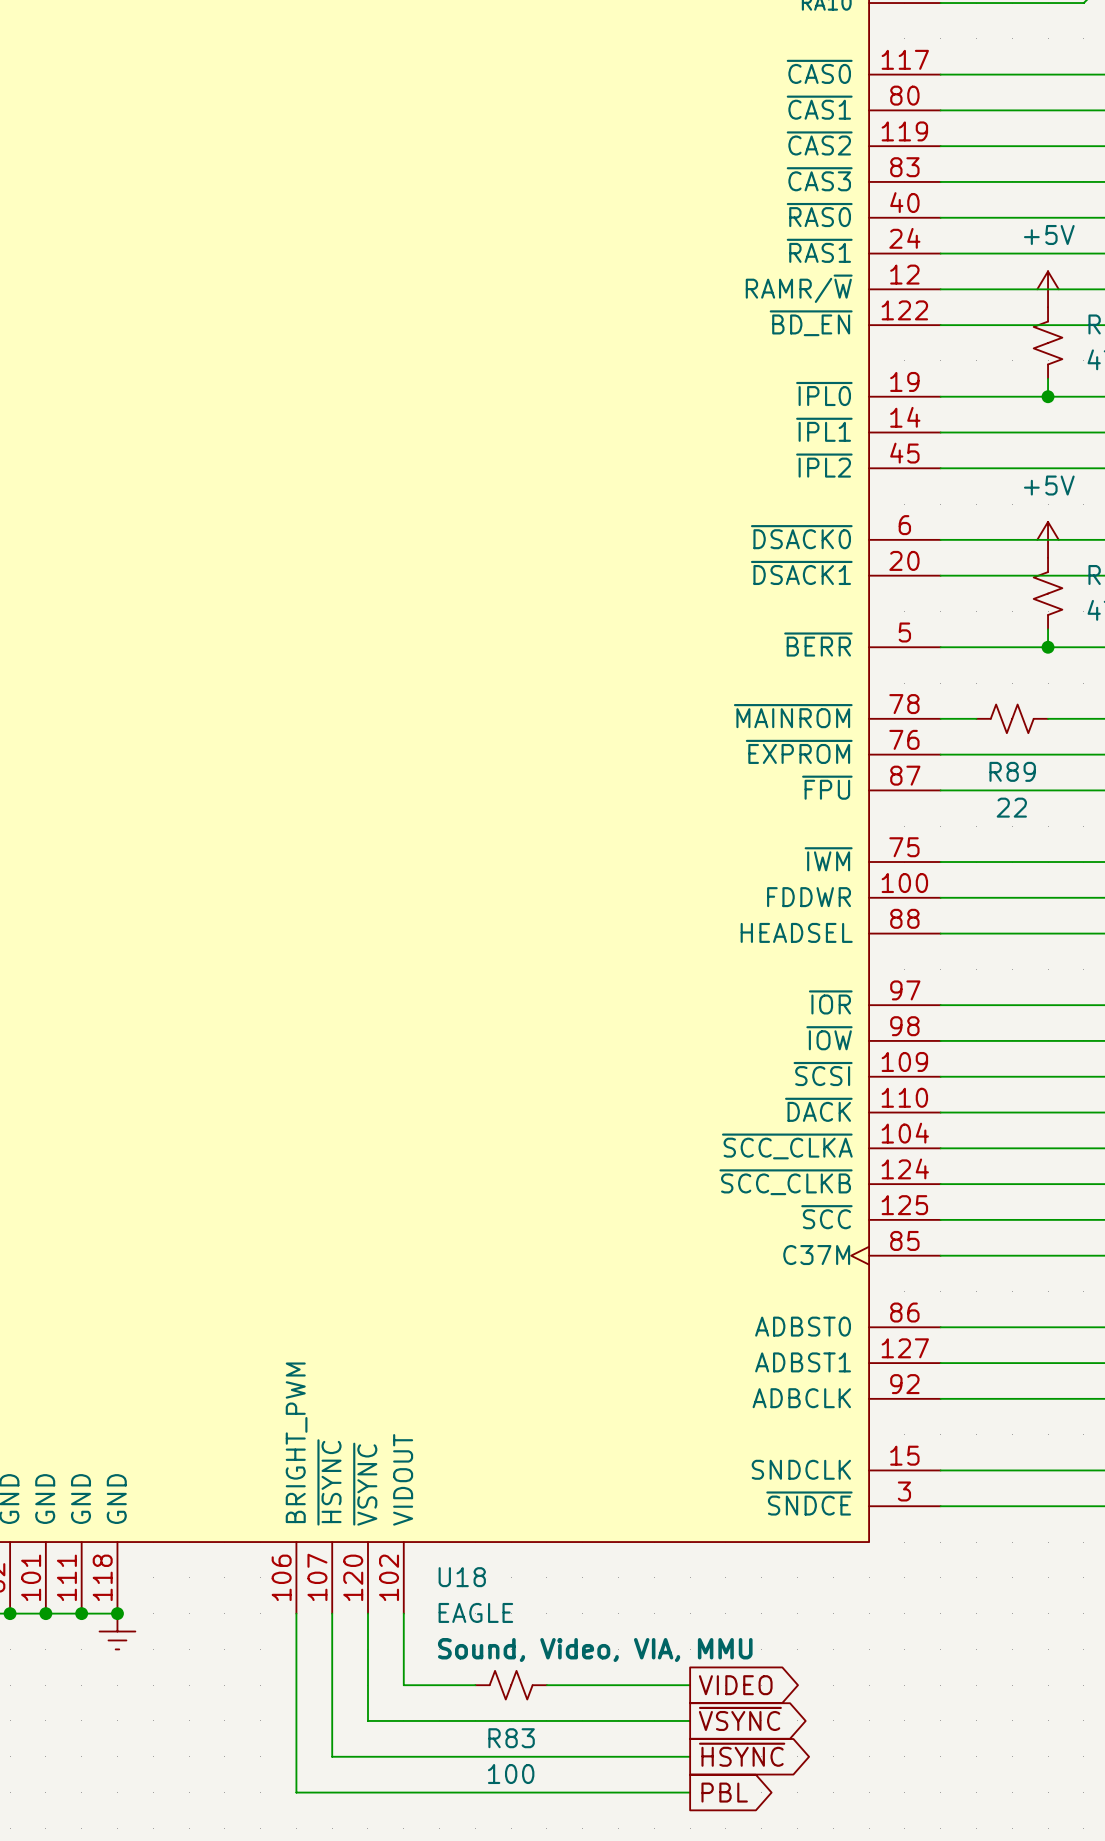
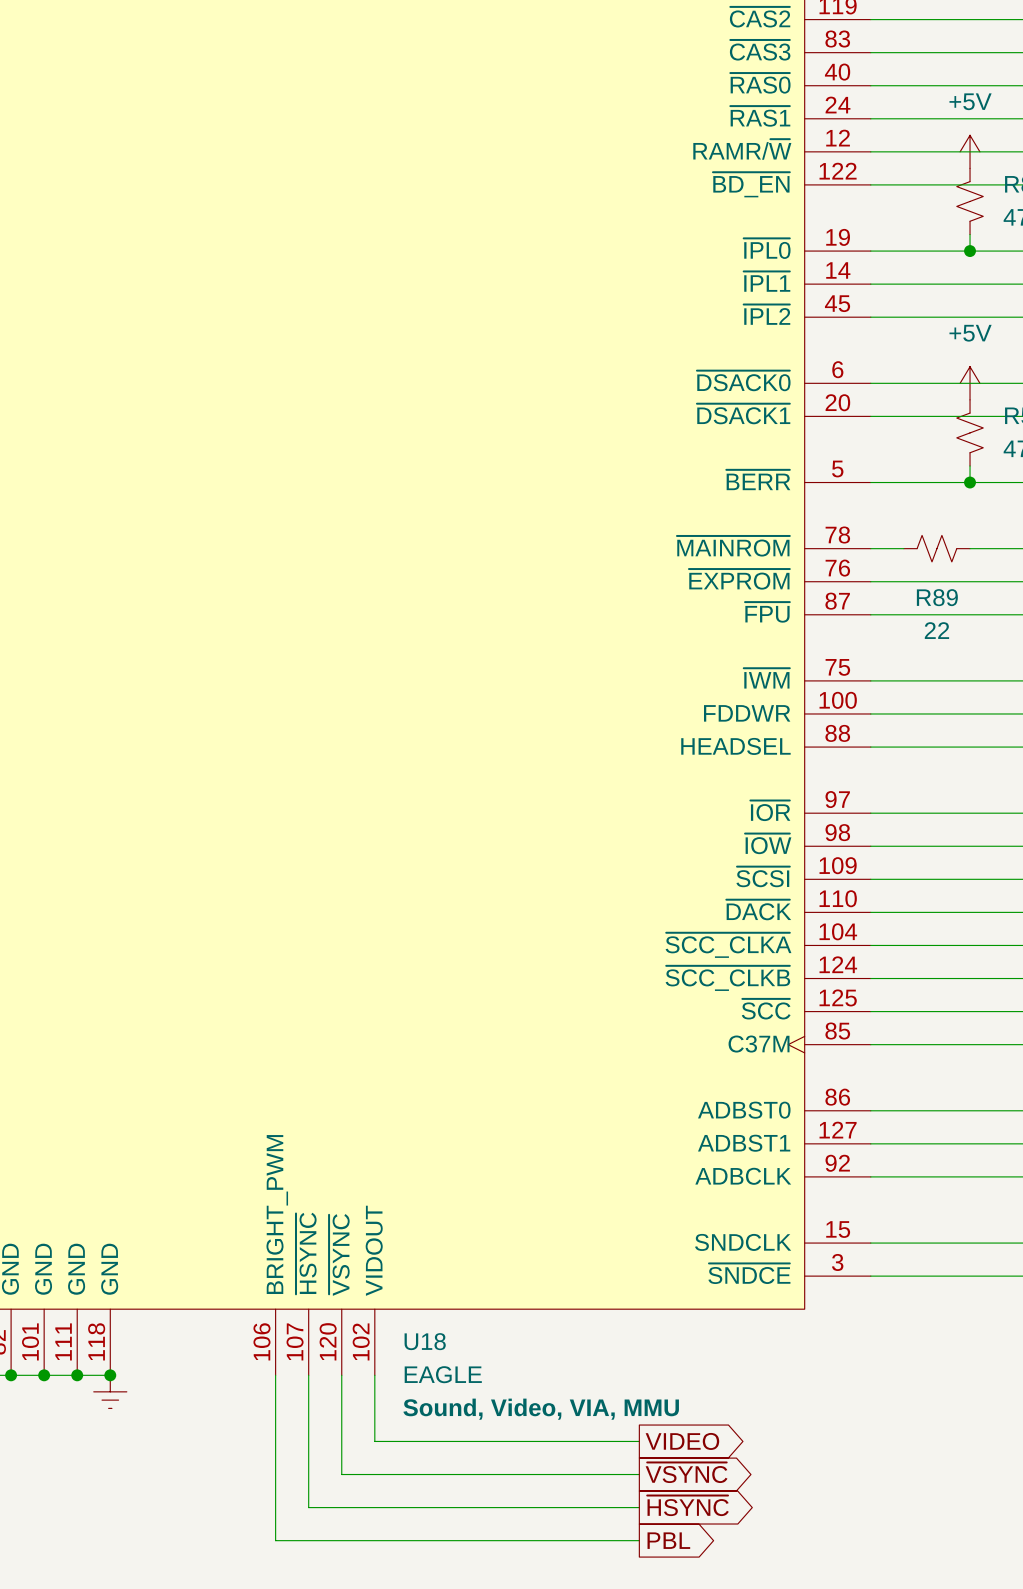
wire: none -> (440, 1441) (507, 1441)
R83: 100 (511, 1685) -> none

